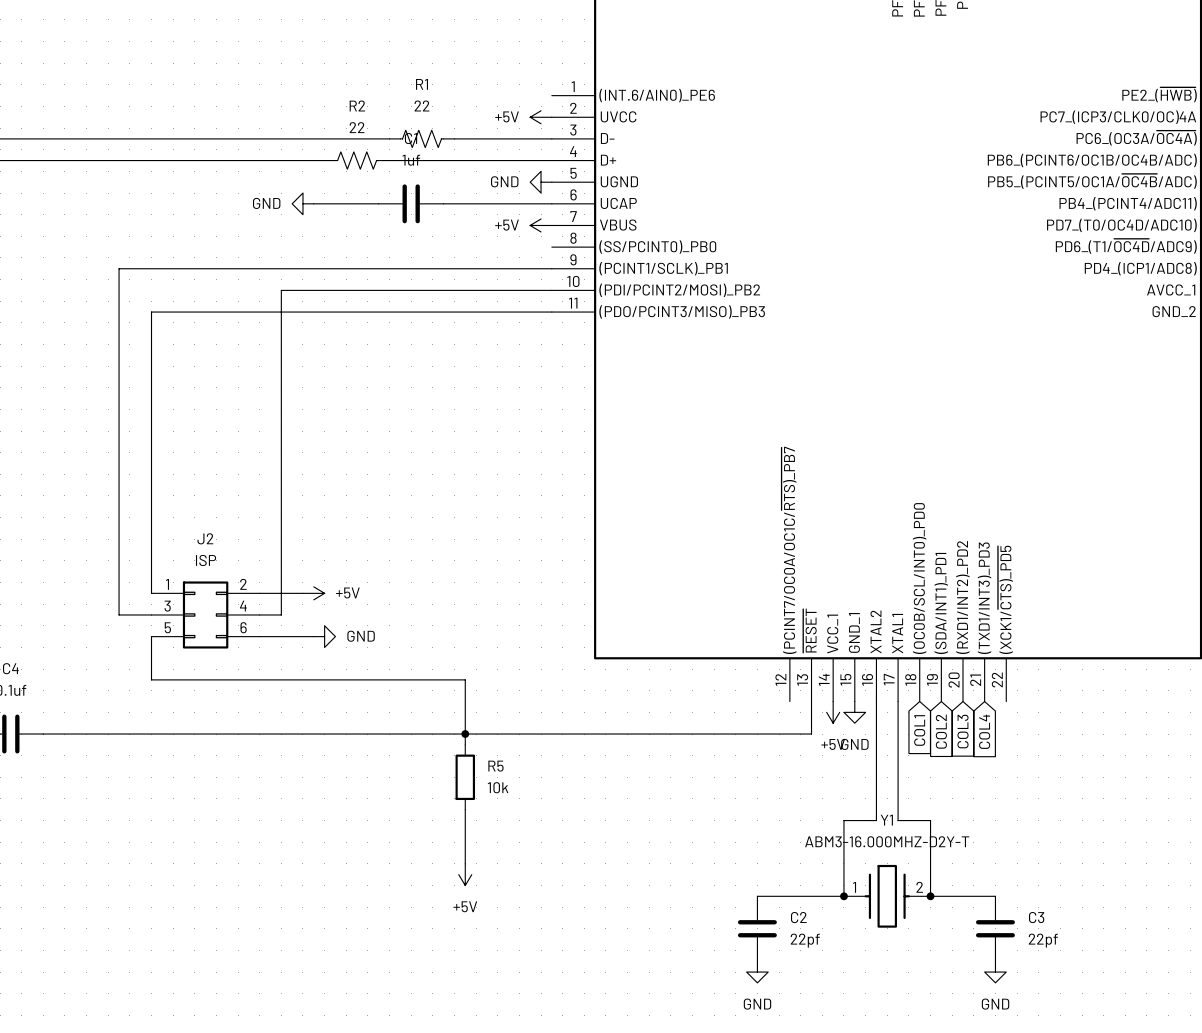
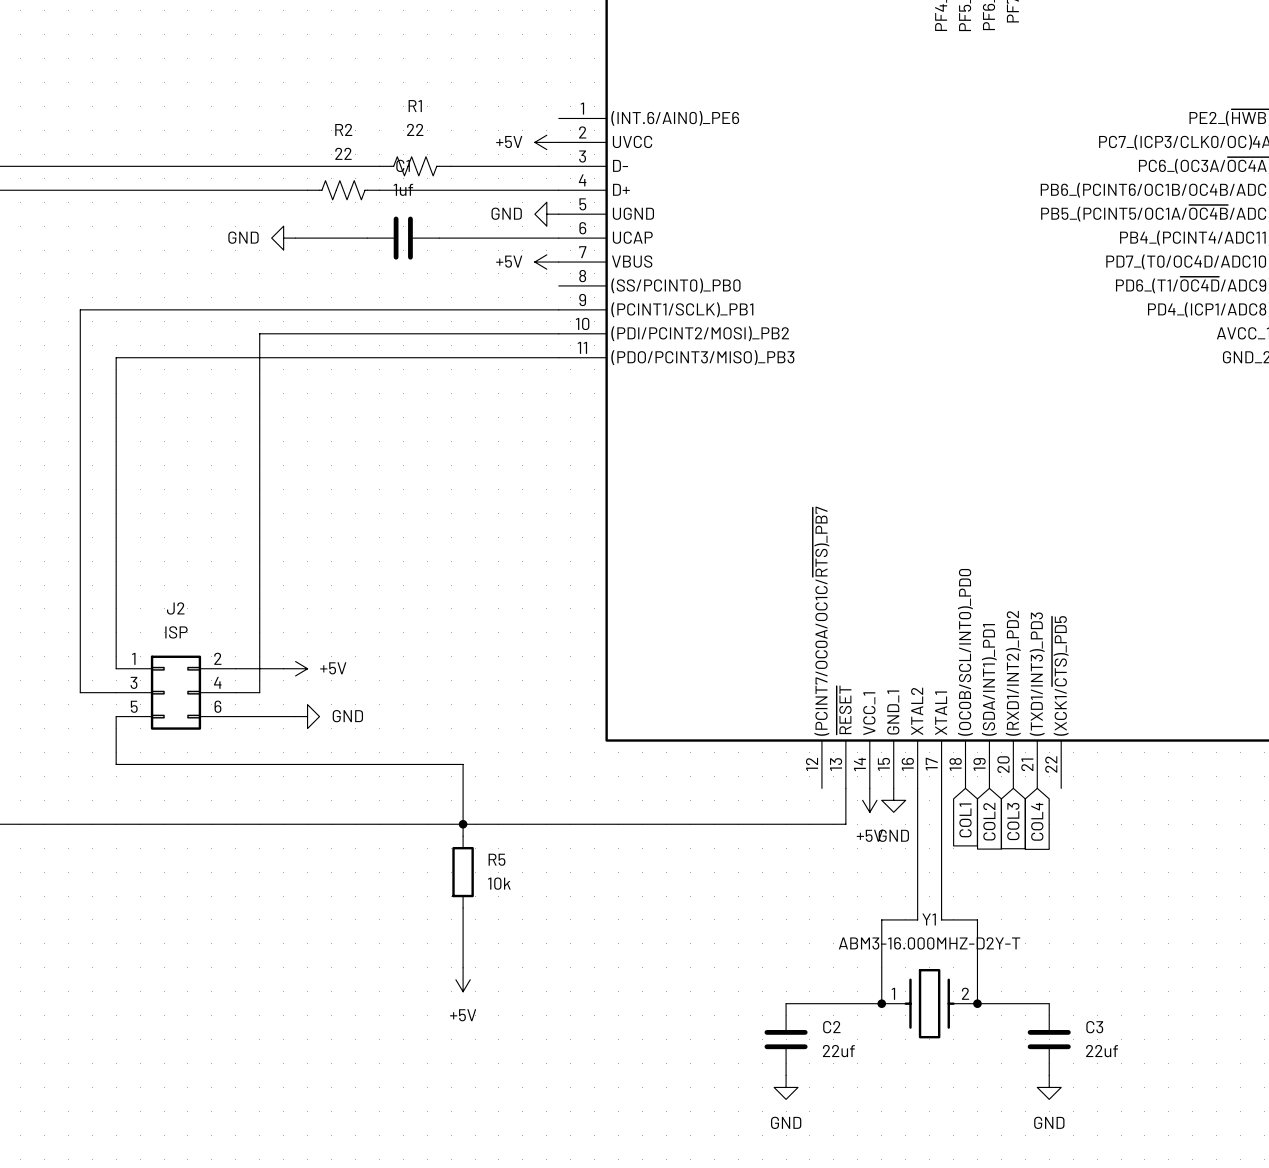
C2 value: 22pf (805, 940) -> 22uf (838, 1051)
C3 value: 22pf (1043, 940) -> 22uf (1102, 1051)

